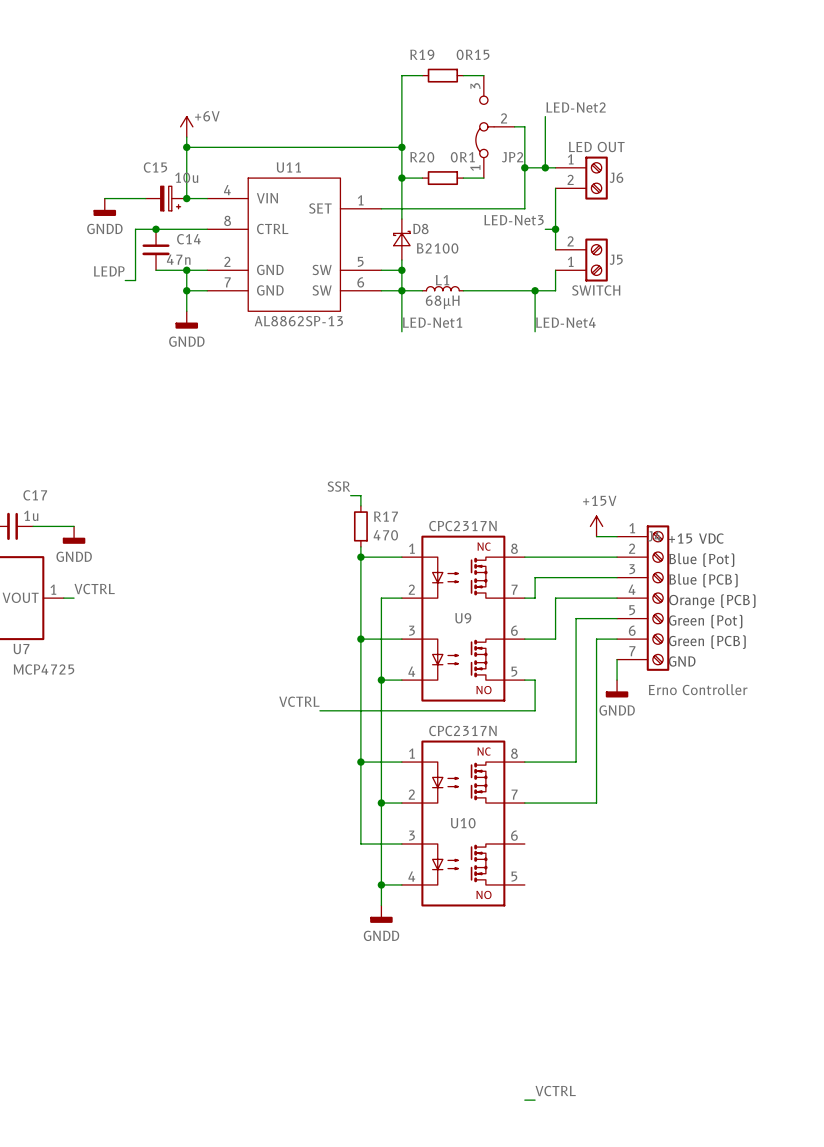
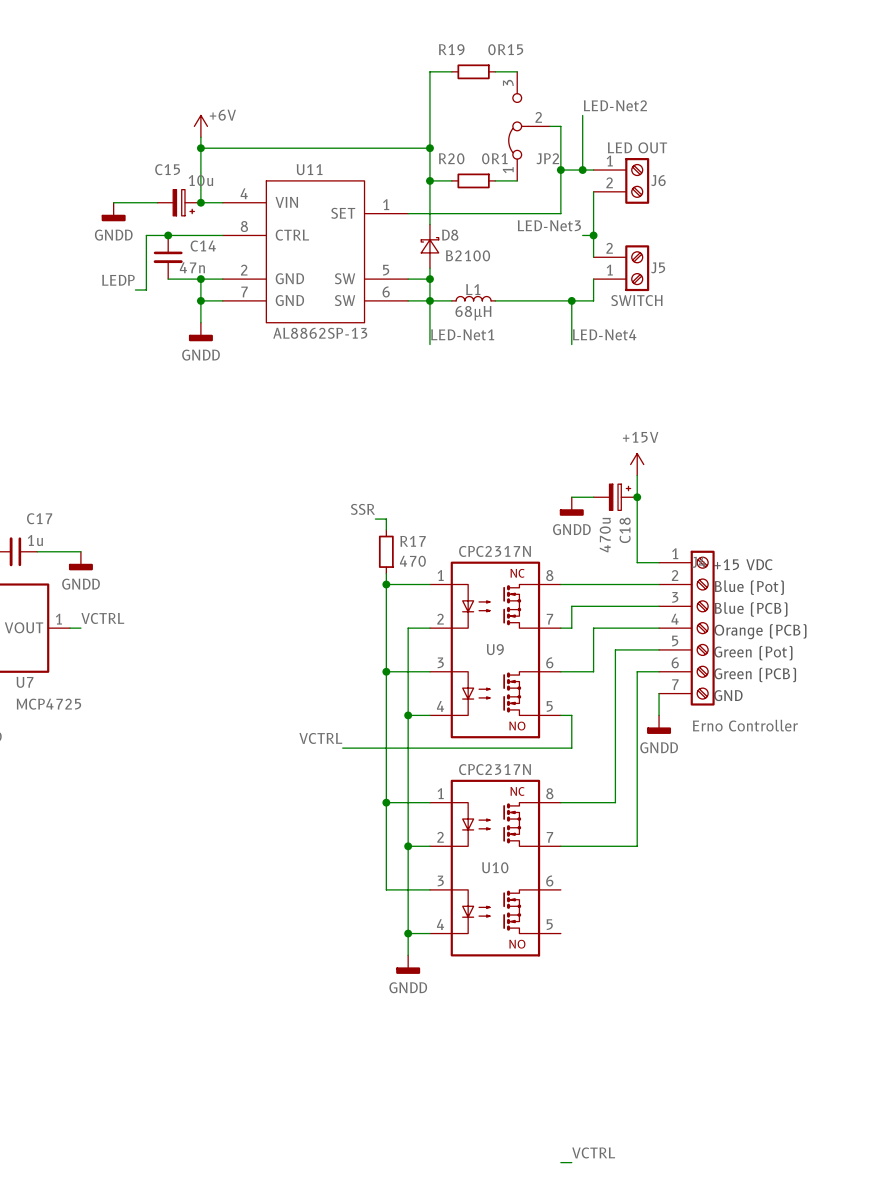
wire: none -> (637, 475) (637, 562)
wire: none -> (571, 497) (593, 497)
C18: none -> 470u (615, 497)
junction: none -> (637, 497)
power symbol: none -> GNDD (571, 506)
power symbol position: +15V (596, 526) -> +15V (637, 464)

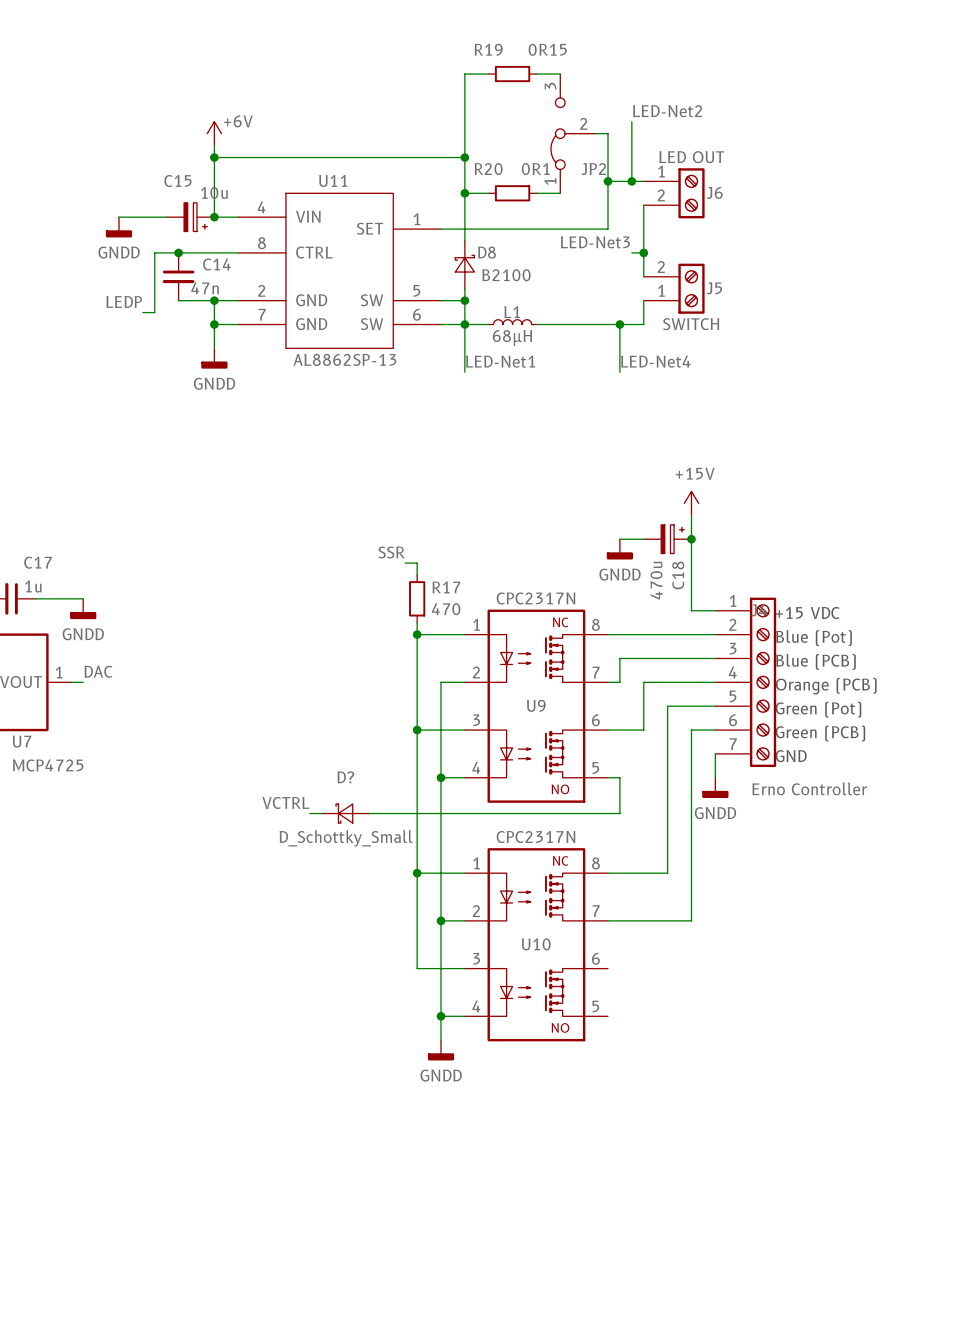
label: VCTRL (102, 618) -> DAC (98, 671)
label position: VCTRL (320, 738) -> VCTRL (285, 802)
wire: none -> (309, 813) (321, 813)
D?: none -> D_Schottky_Small (345, 813)
label: VCTRL (593, 1152) -> none
wire: (560, 1162) (571, 1162) -> none

